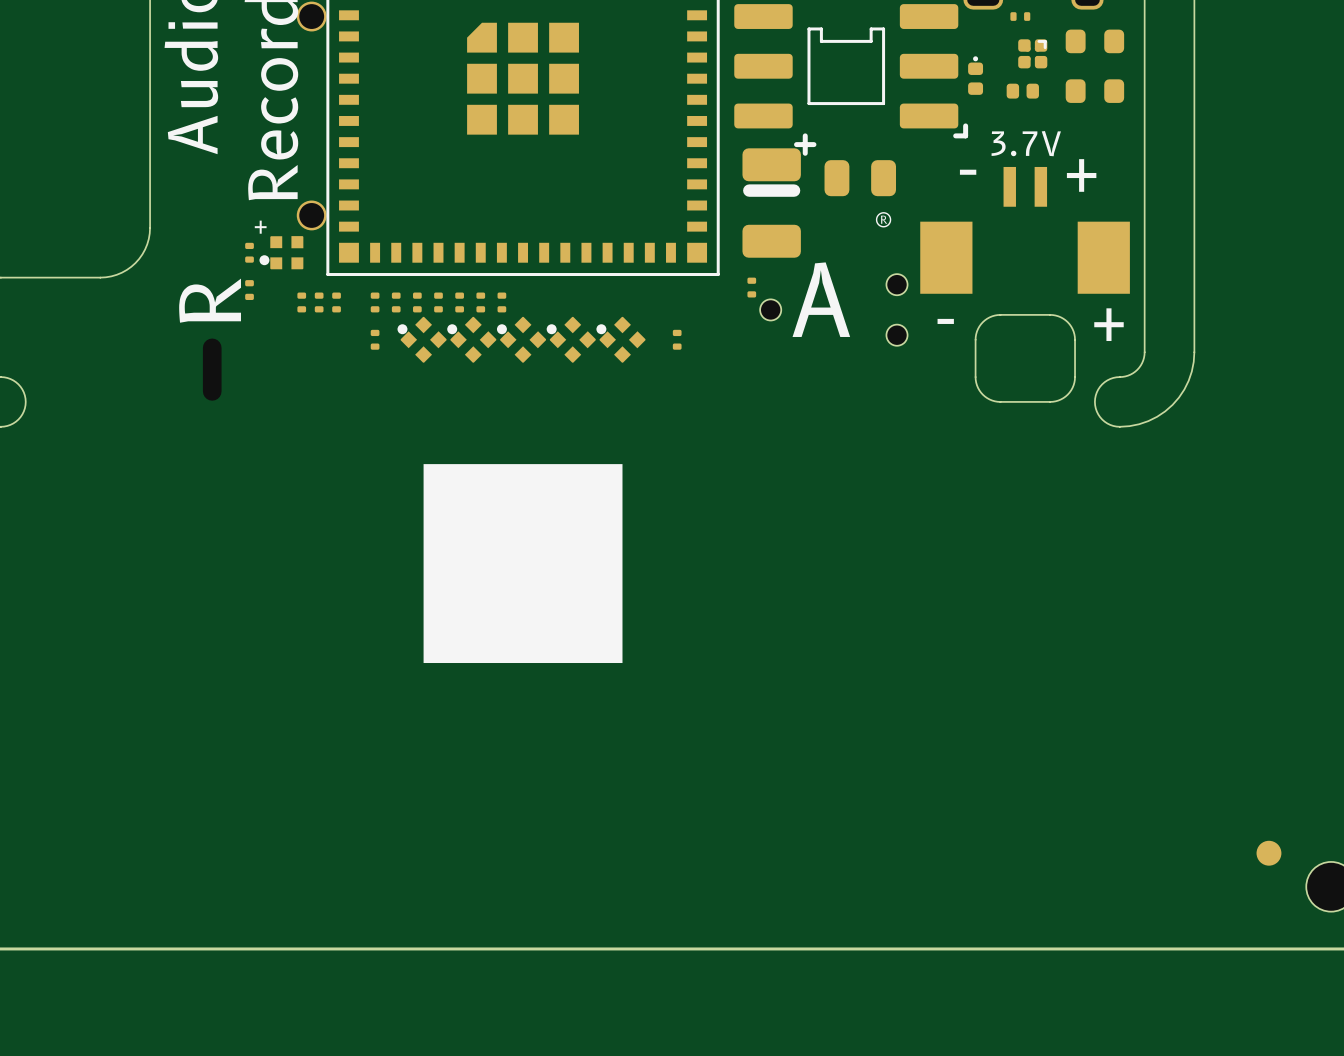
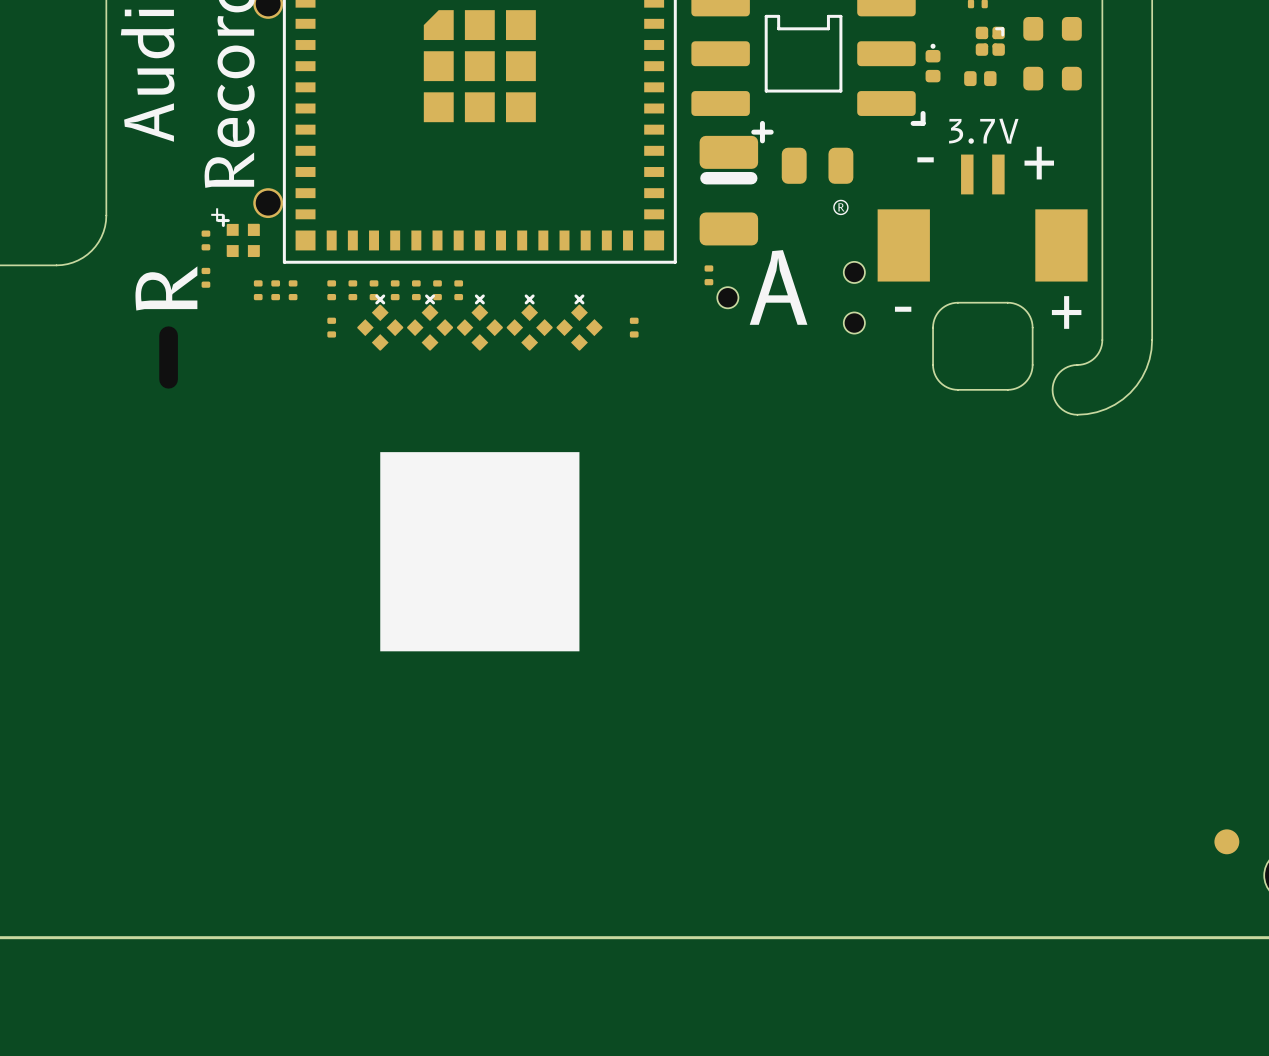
part footprint: [259, 236, 304, 270] -> [216, 214, 260, 258]
part footprint: [397, 316, 447, 363] -> [357, 294, 404, 351]
part footprint: [447, 316, 497, 363] -> [407, 294, 454, 351]
part footprint: [496, 316, 546, 363] -> [456, 294, 503, 351]
part footprint: [546, 316, 596, 363] -> [506, 294, 553, 351]
part footprint: [596, 316, 646, 363] -> [556, 294, 603, 351]

